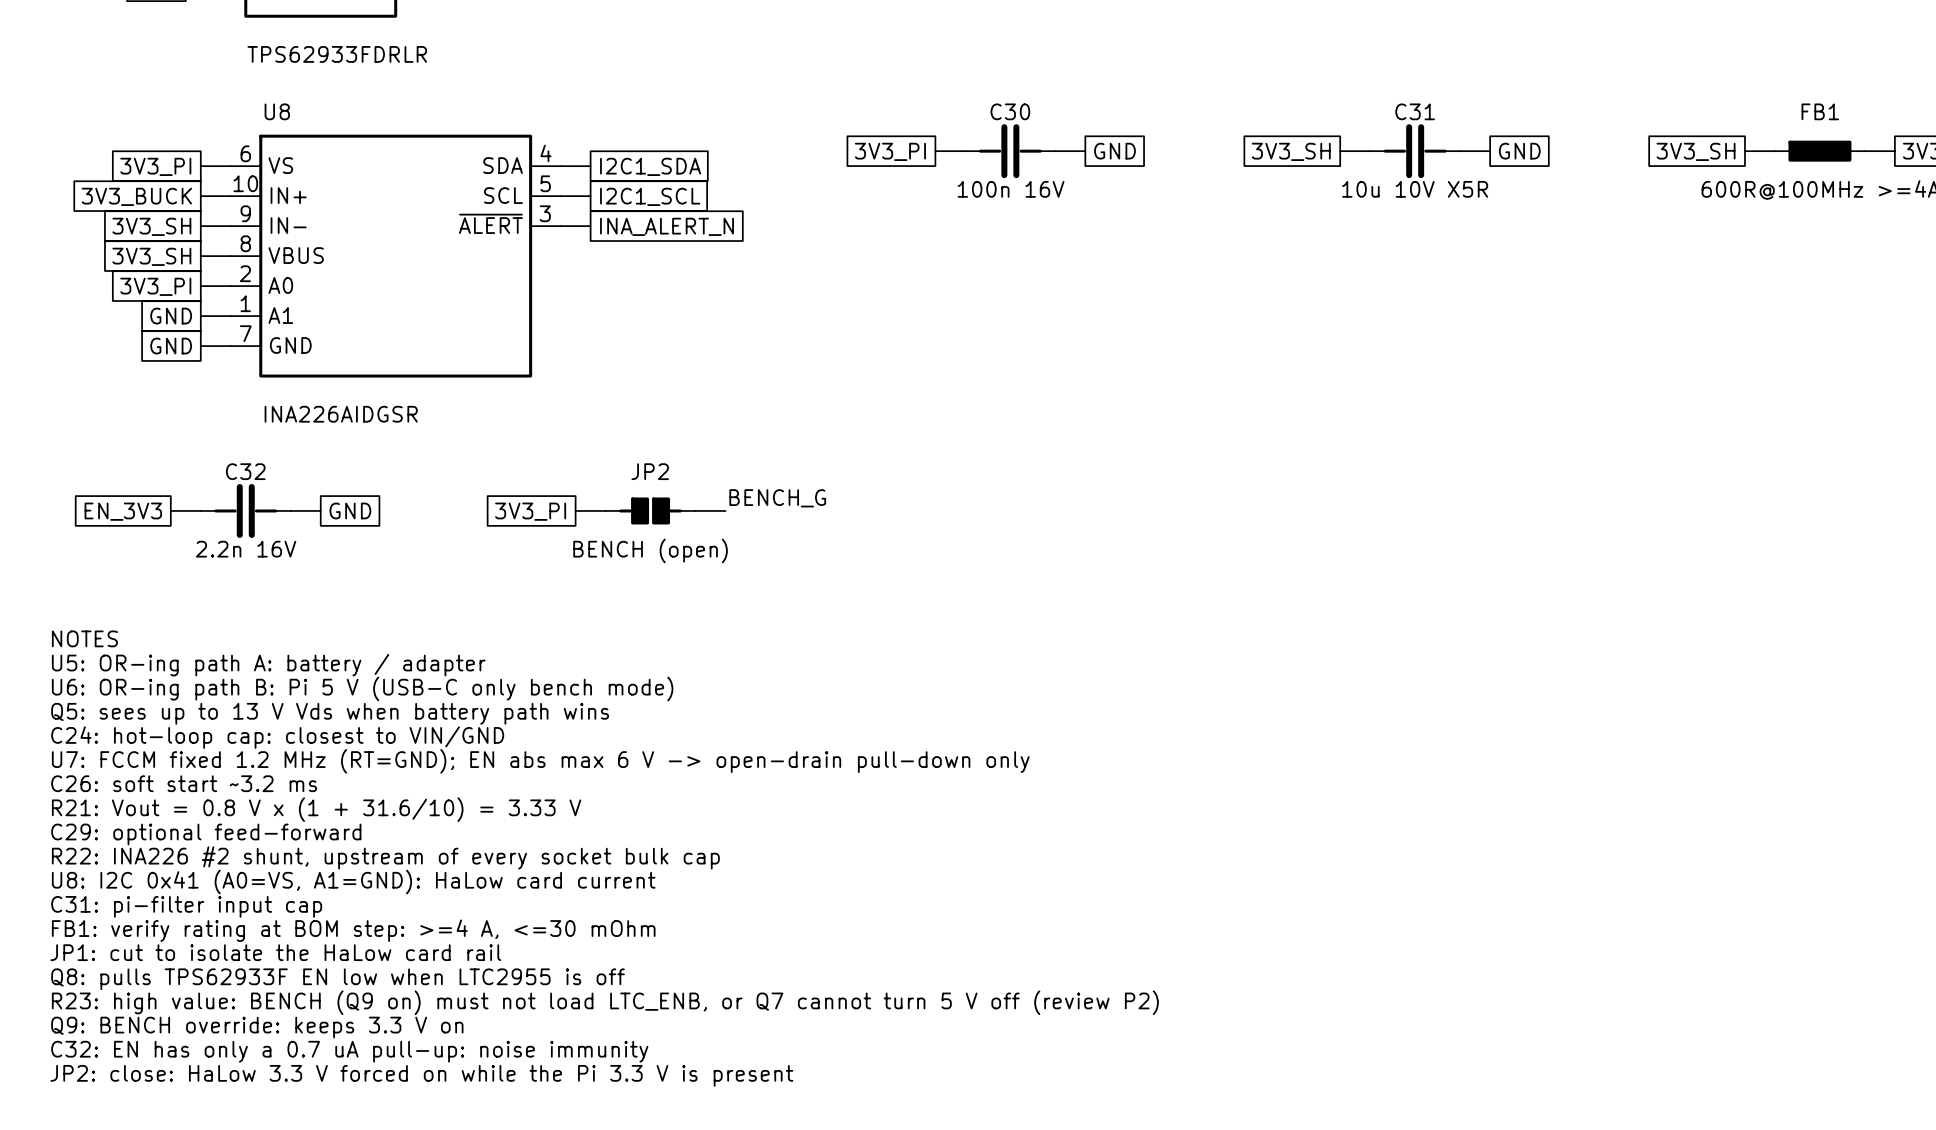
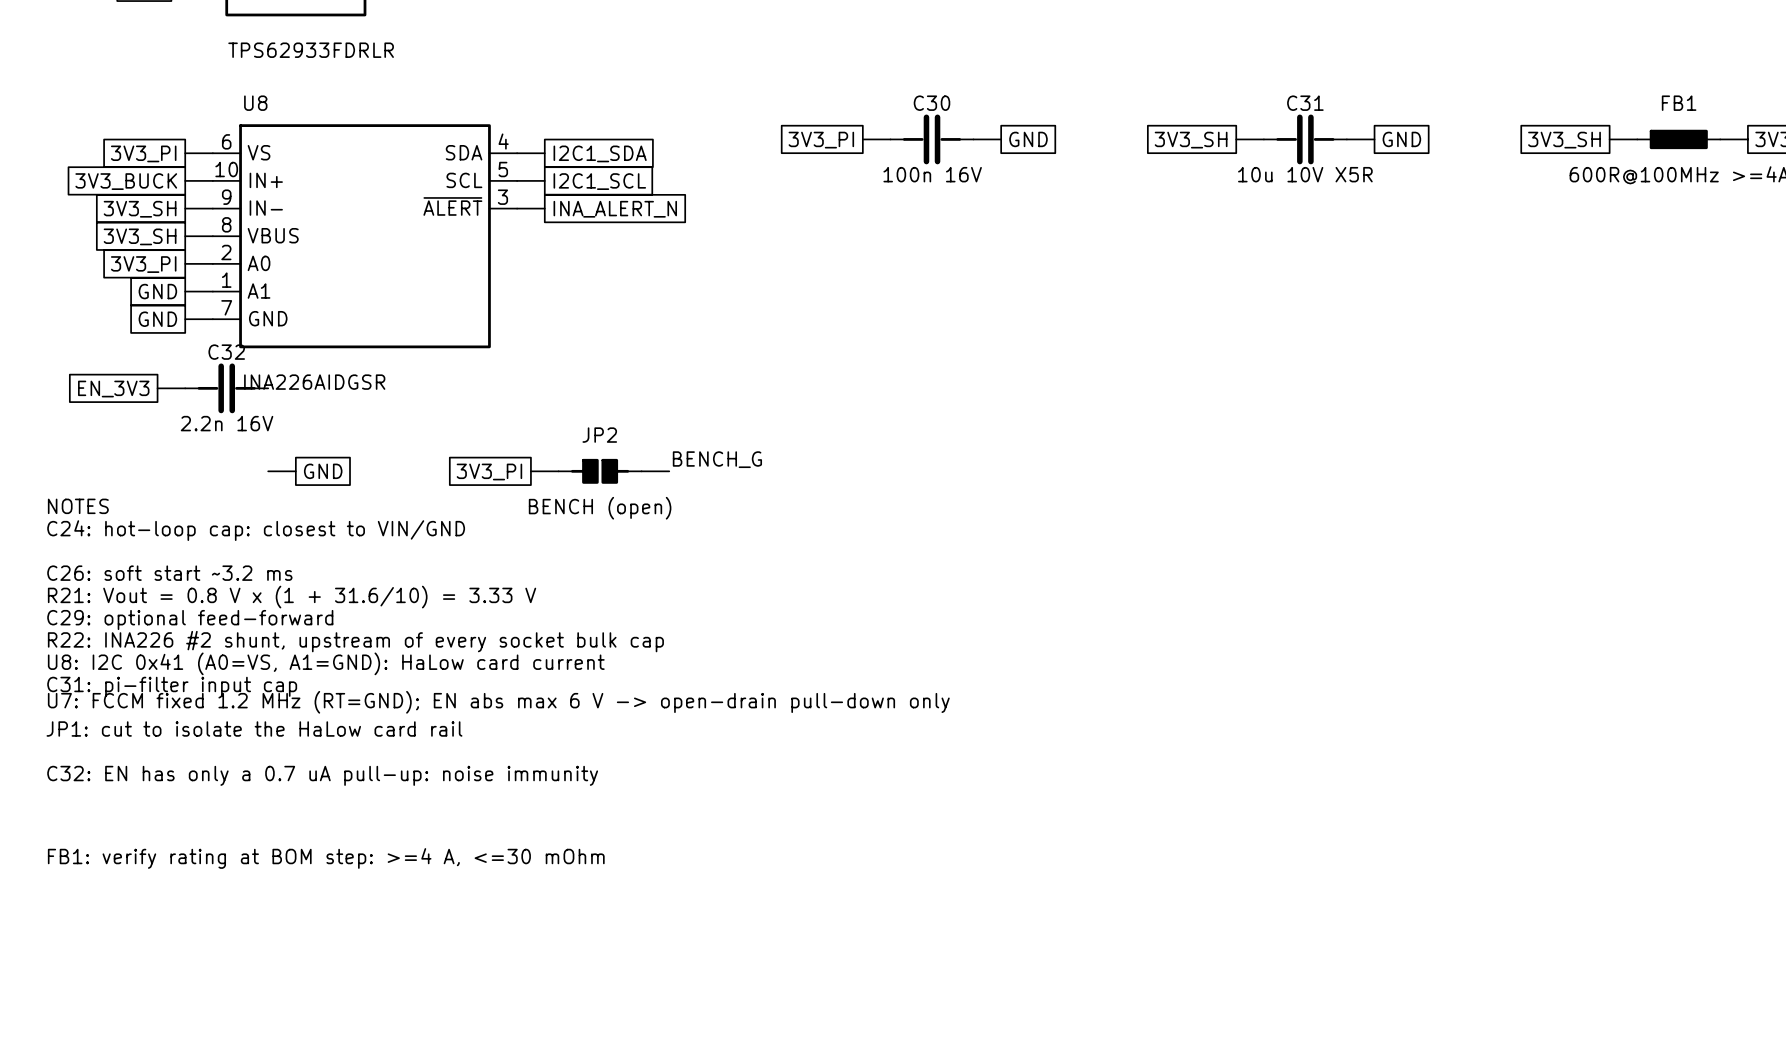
wire: (170, 510) (200, 510) -> (157, 388) (185, 388)
C32 position: (245, 510) -> (226, 388)
global label position: EN_3V3 (123, 511) -> EN_3V3 (113, 389)
text position: NOTES (84, 638) -> NOTES (78, 506)
text: U5: OR-ing path A: battery / adapter (268, 665) -> none
text: U6: OR-ing path B: Pi 5 V (USB-C only bench mode) (362, 688) -> none
text: Q5: sees up to 13 V Vds when battery path wins (330, 713) -> none
text position: C24: hot-loop cap: closest to VIN/GND (277, 737) -> C24: hot-loop cap: closest to VIN/GND (256, 530)
text position: C26: soft start ~3.2 ms (184, 783) -> C26: soft start ~3.2 ms (169, 573)
text position: R21: Vout = 0.8 V x (1 + 31.6/10) = 3.33 V (316, 809) -> R21: Vout = 0.8 V x (1 + 31.6/10) = 3.33 V (292, 597)
text position: C29: optional feed-forward (206, 834) -> C29: optional feed-forward (190, 619)
text position: R22: INA226 #2 shunt, upstream of every socket bulk cap (385, 857) -> R22: INA226 #2 shunt, upstream of every socket bulk cap (355, 641)
text position: U8: I2C 0x41 (A0=VS, A1=GND): HaLow card current (353, 882) -> U8: I2C 0x41 (A0=VS, A1=GND): HaLow card current (326, 663)
text position: C31: pi-filter input cap (186, 906) -> C31: pi-filter input cap (172, 686)
text position: JP1: cut to isolate the HaLow card rail (275, 952) -> JP1: cut to isolate the HaLow card rail (254, 729)
text: Q8: pulls TPS62933F EN low when LTC2955 is off (338, 979) -> none
text: R23: high value: BENCH (Q9 on) must not load LTC_ENB, or Q7 cannot turn 5 V off (review P2) (605, 1002) -> none
text: Q9: BENCH override: keeps 3.3 V on (257, 1027) -> none
text position: C32: EN has only a 0.7 uA pull-up: noise immunity (349, 1051) -> C32: EN has only a 0.7 uA pull-up: noise immunity (322, 775)
text: JP2: close: HaLow 3.3 V forced on while the Pi 3.3 V is present (421, 1075) -> none

